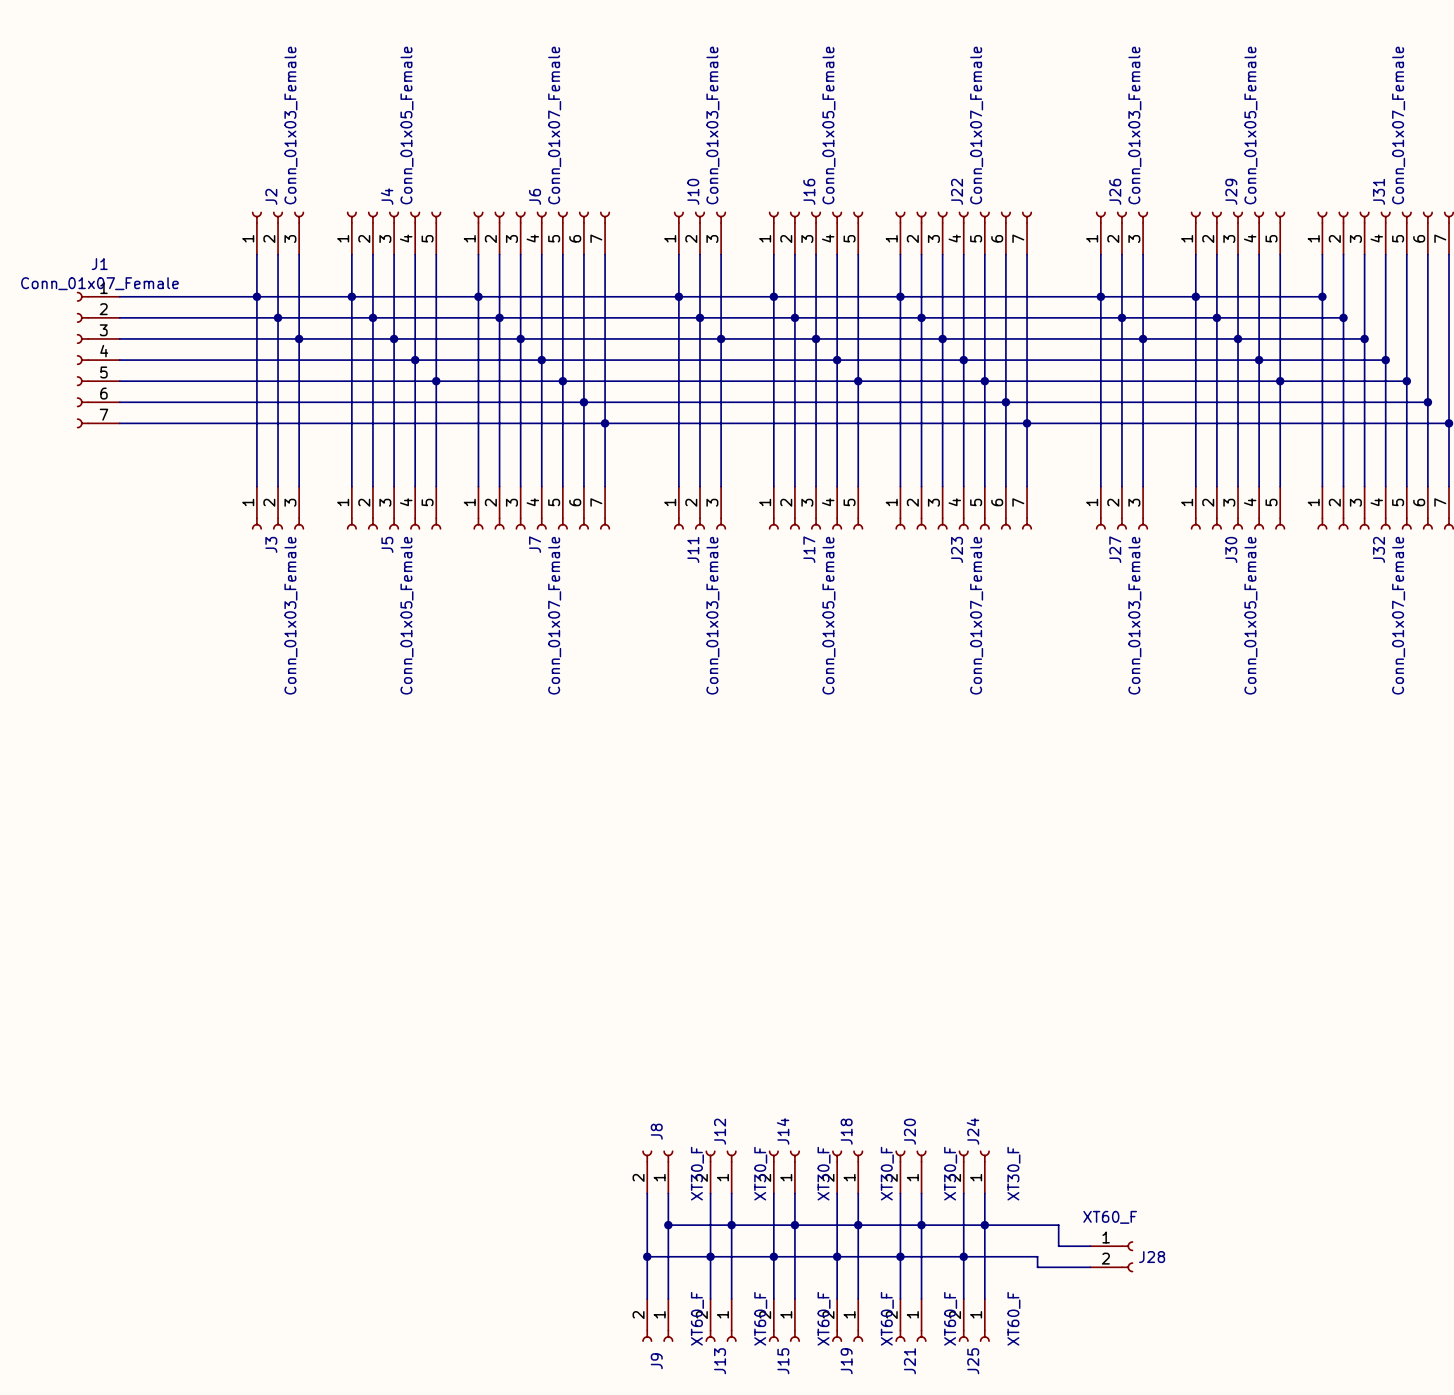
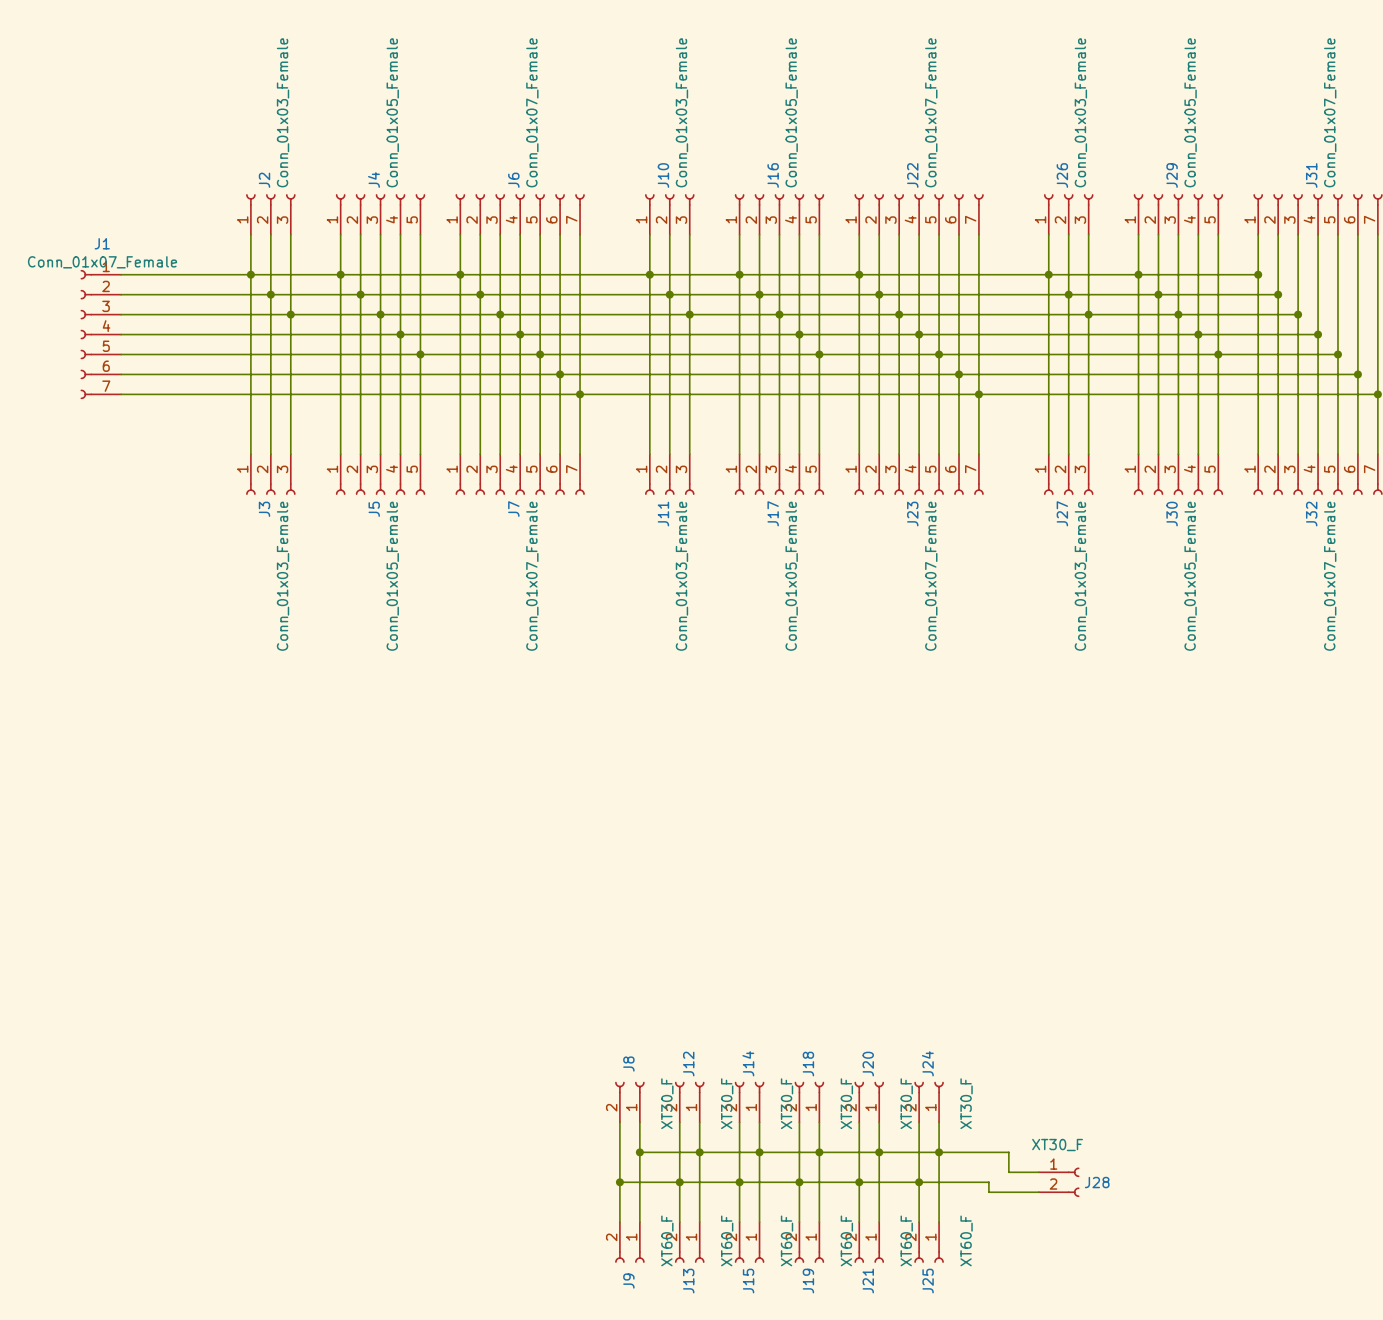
J28 value: XT60_F (1110, 1217) -> XT30_F (1057, 1145)

